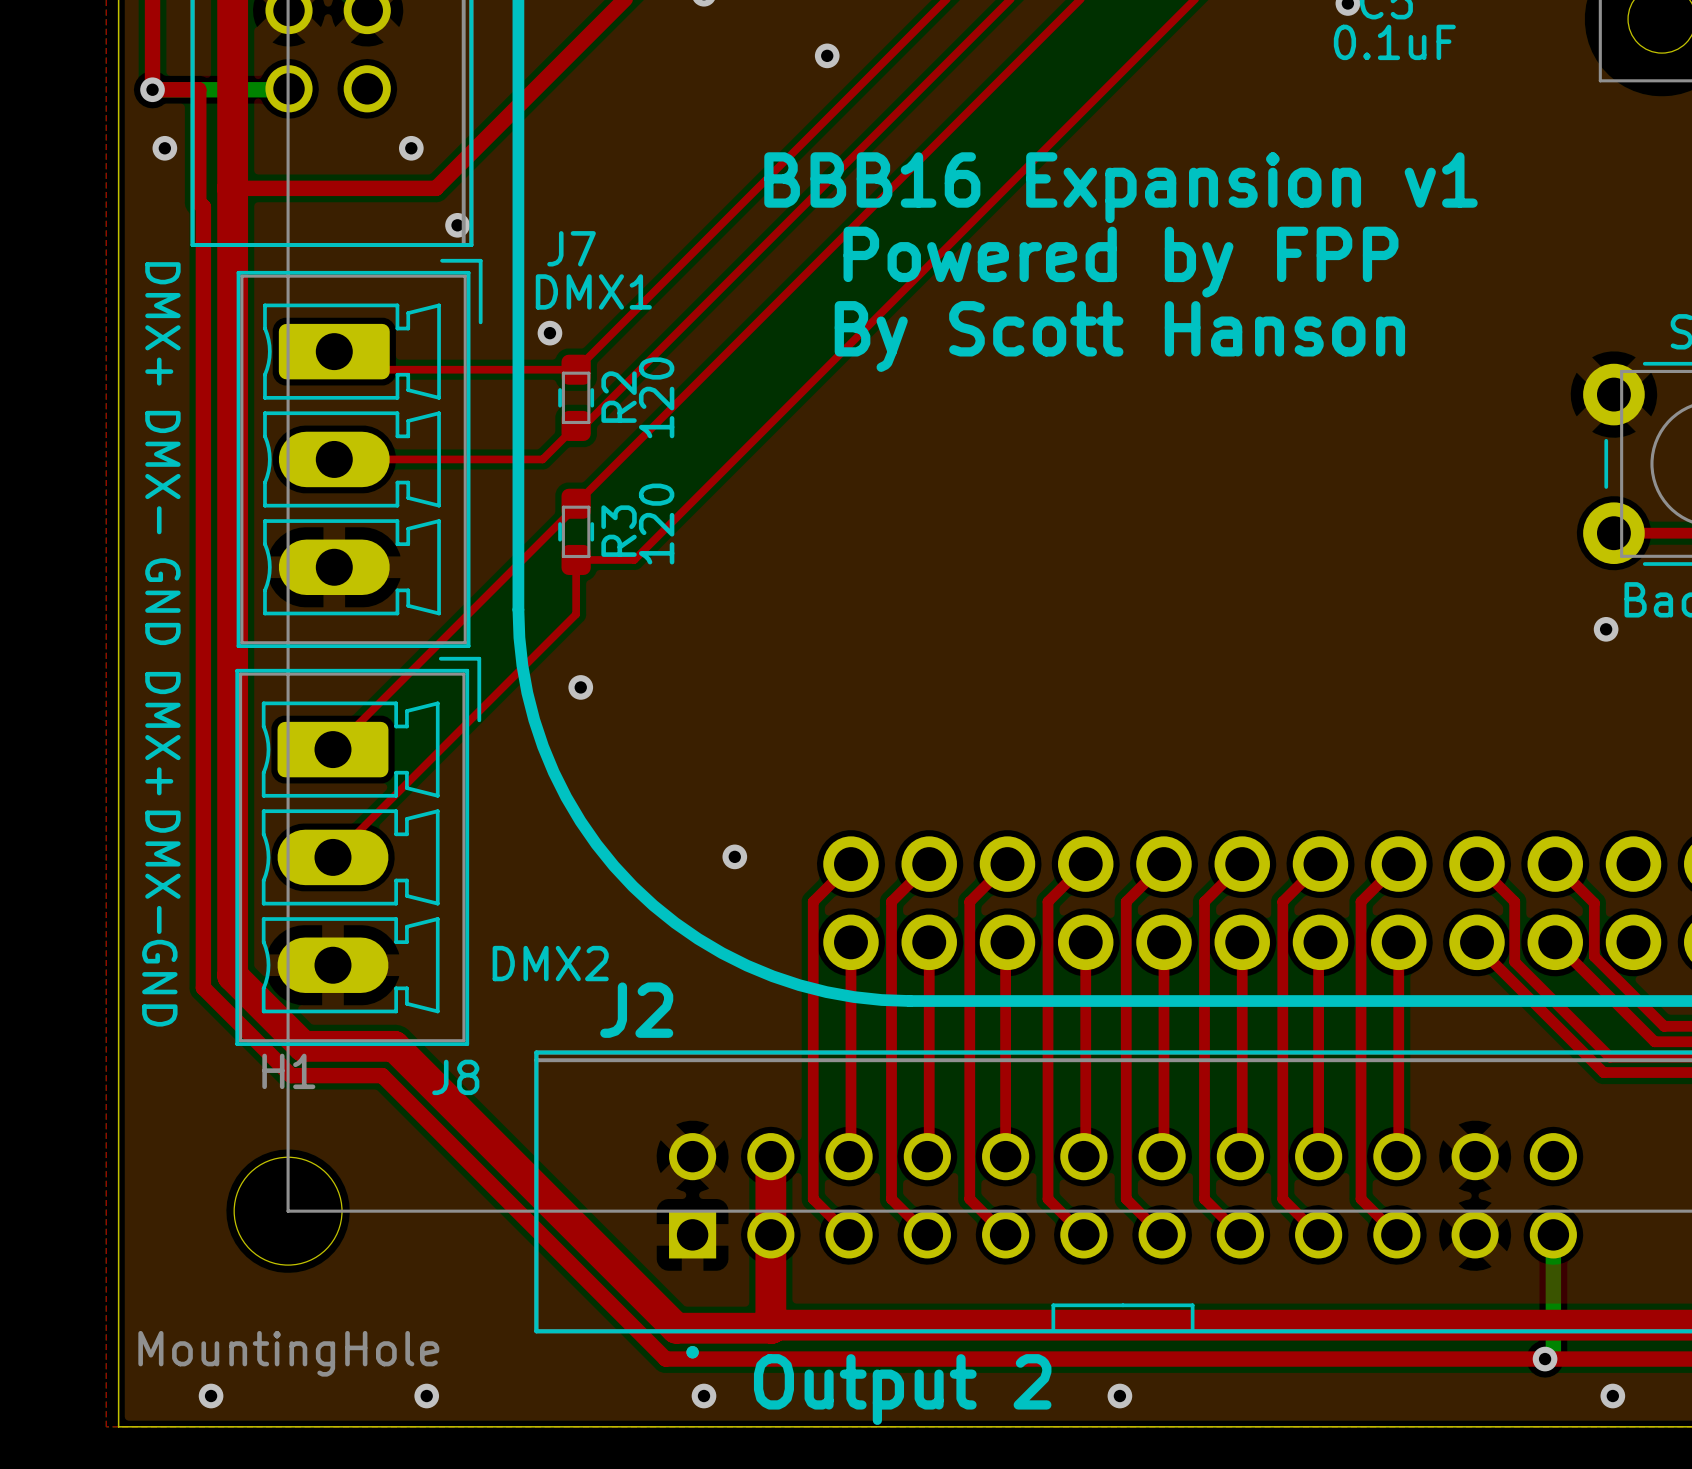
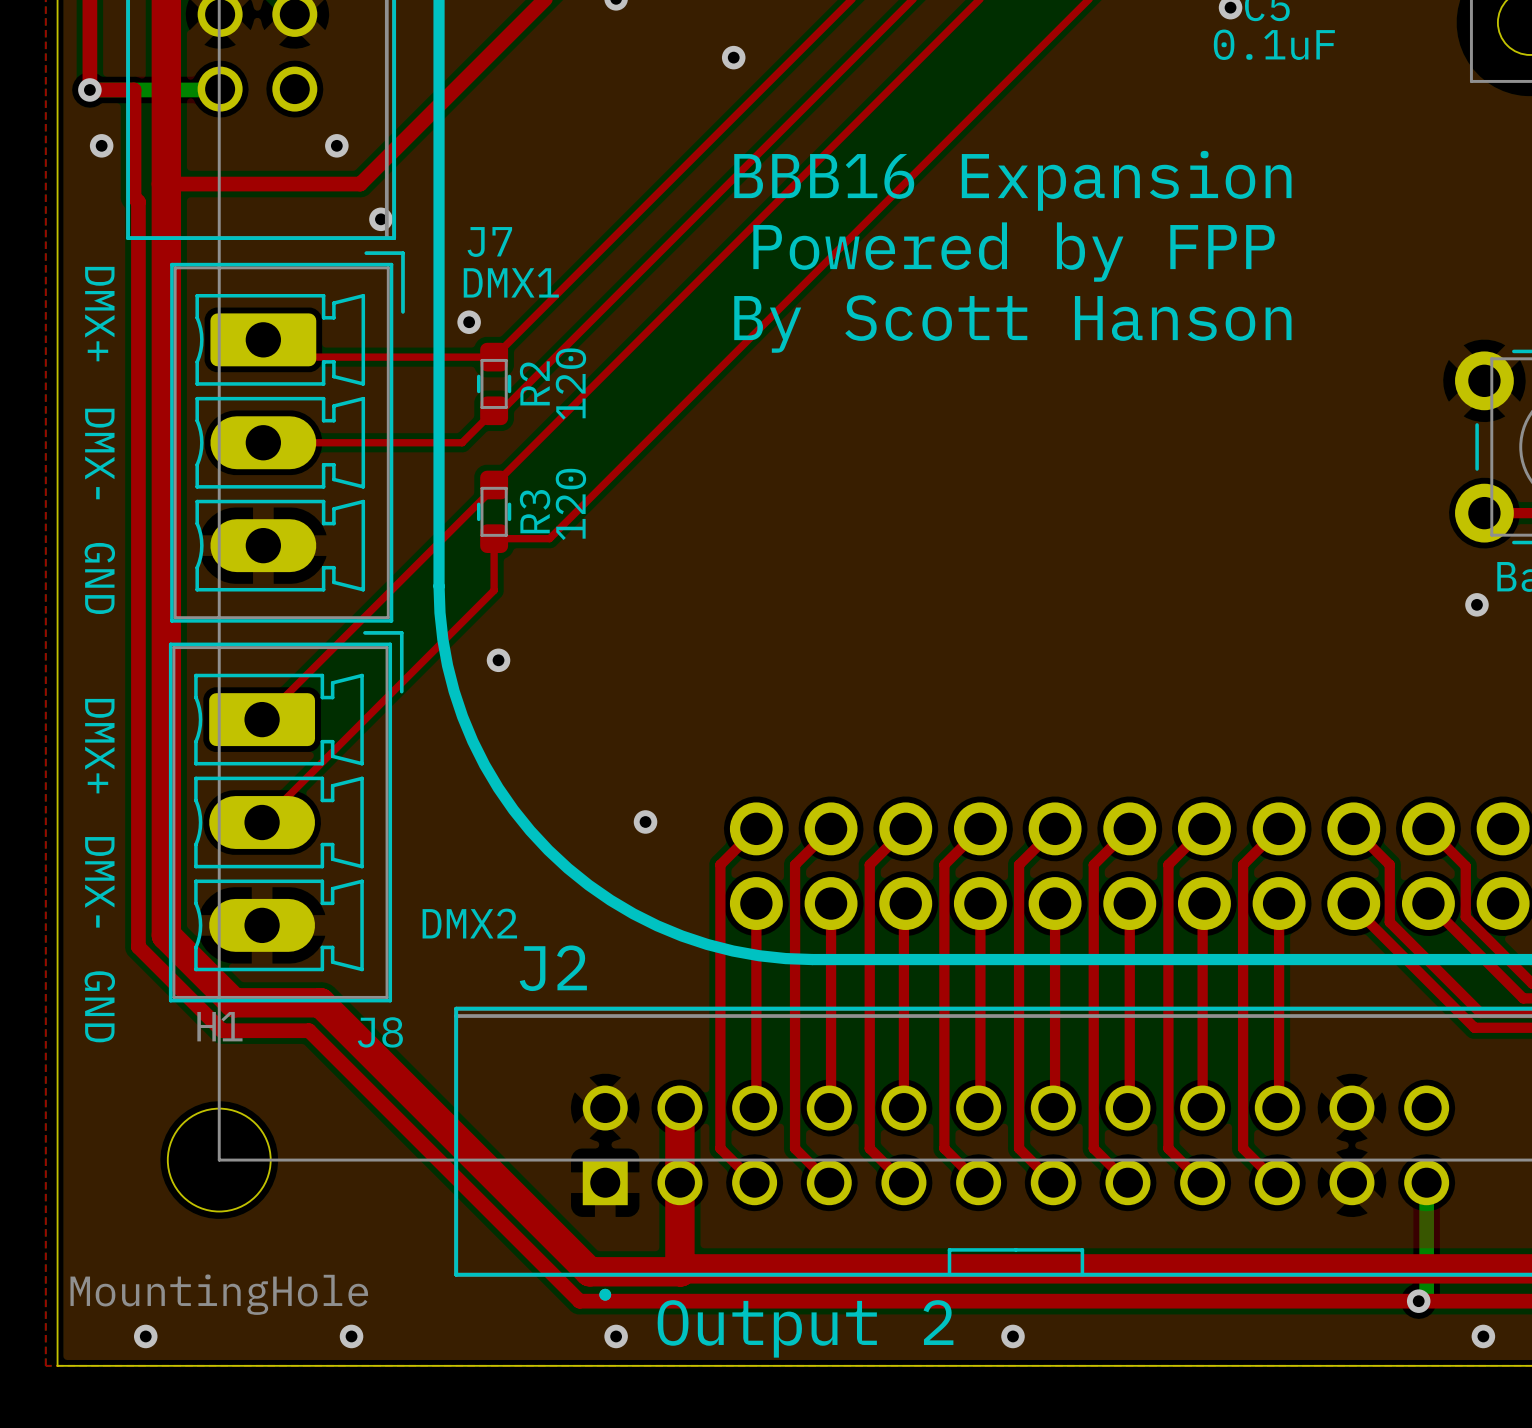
text: BBB16 Expansion v1 (1121, 187) -> BBB16 Expansion (1012, 180)
text position: DMX+ (162, 733) -> DMX+ (99, 746)
text position: DMX- (162, 872) -> DMX- (99, 882)
text position: GND (159, 983) -> GND (99, 1006)

